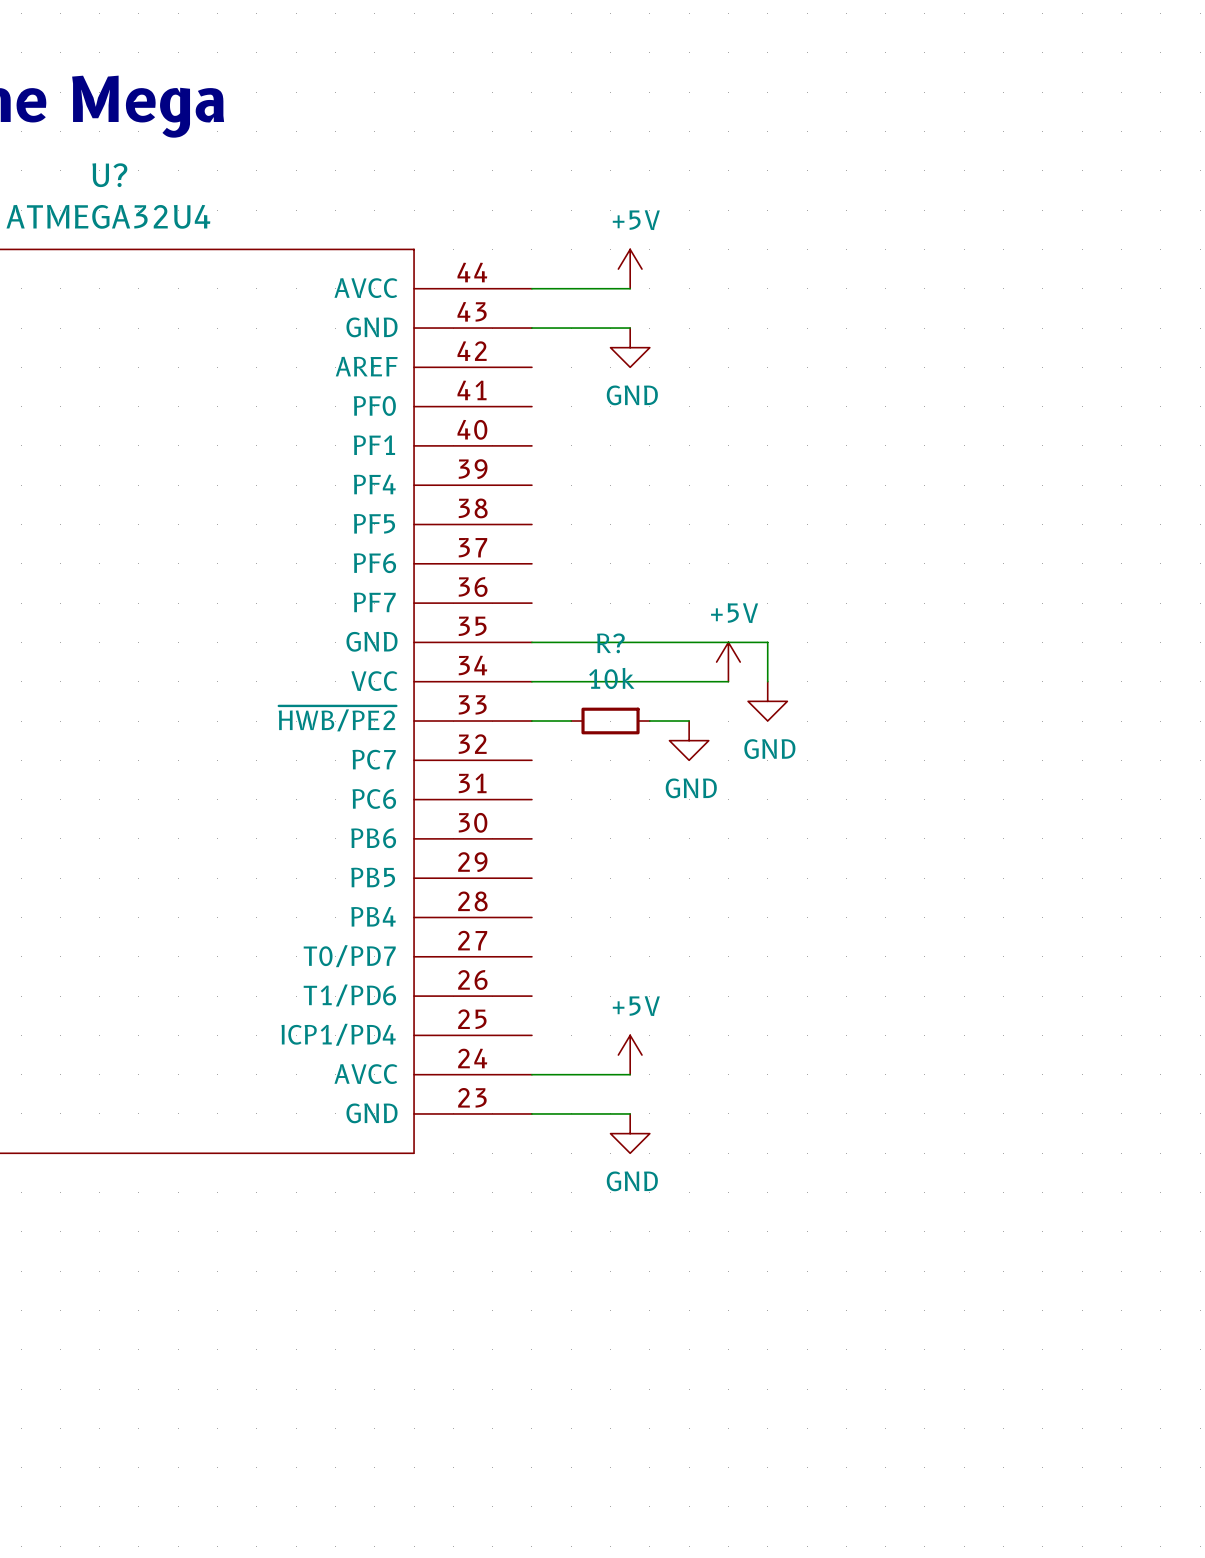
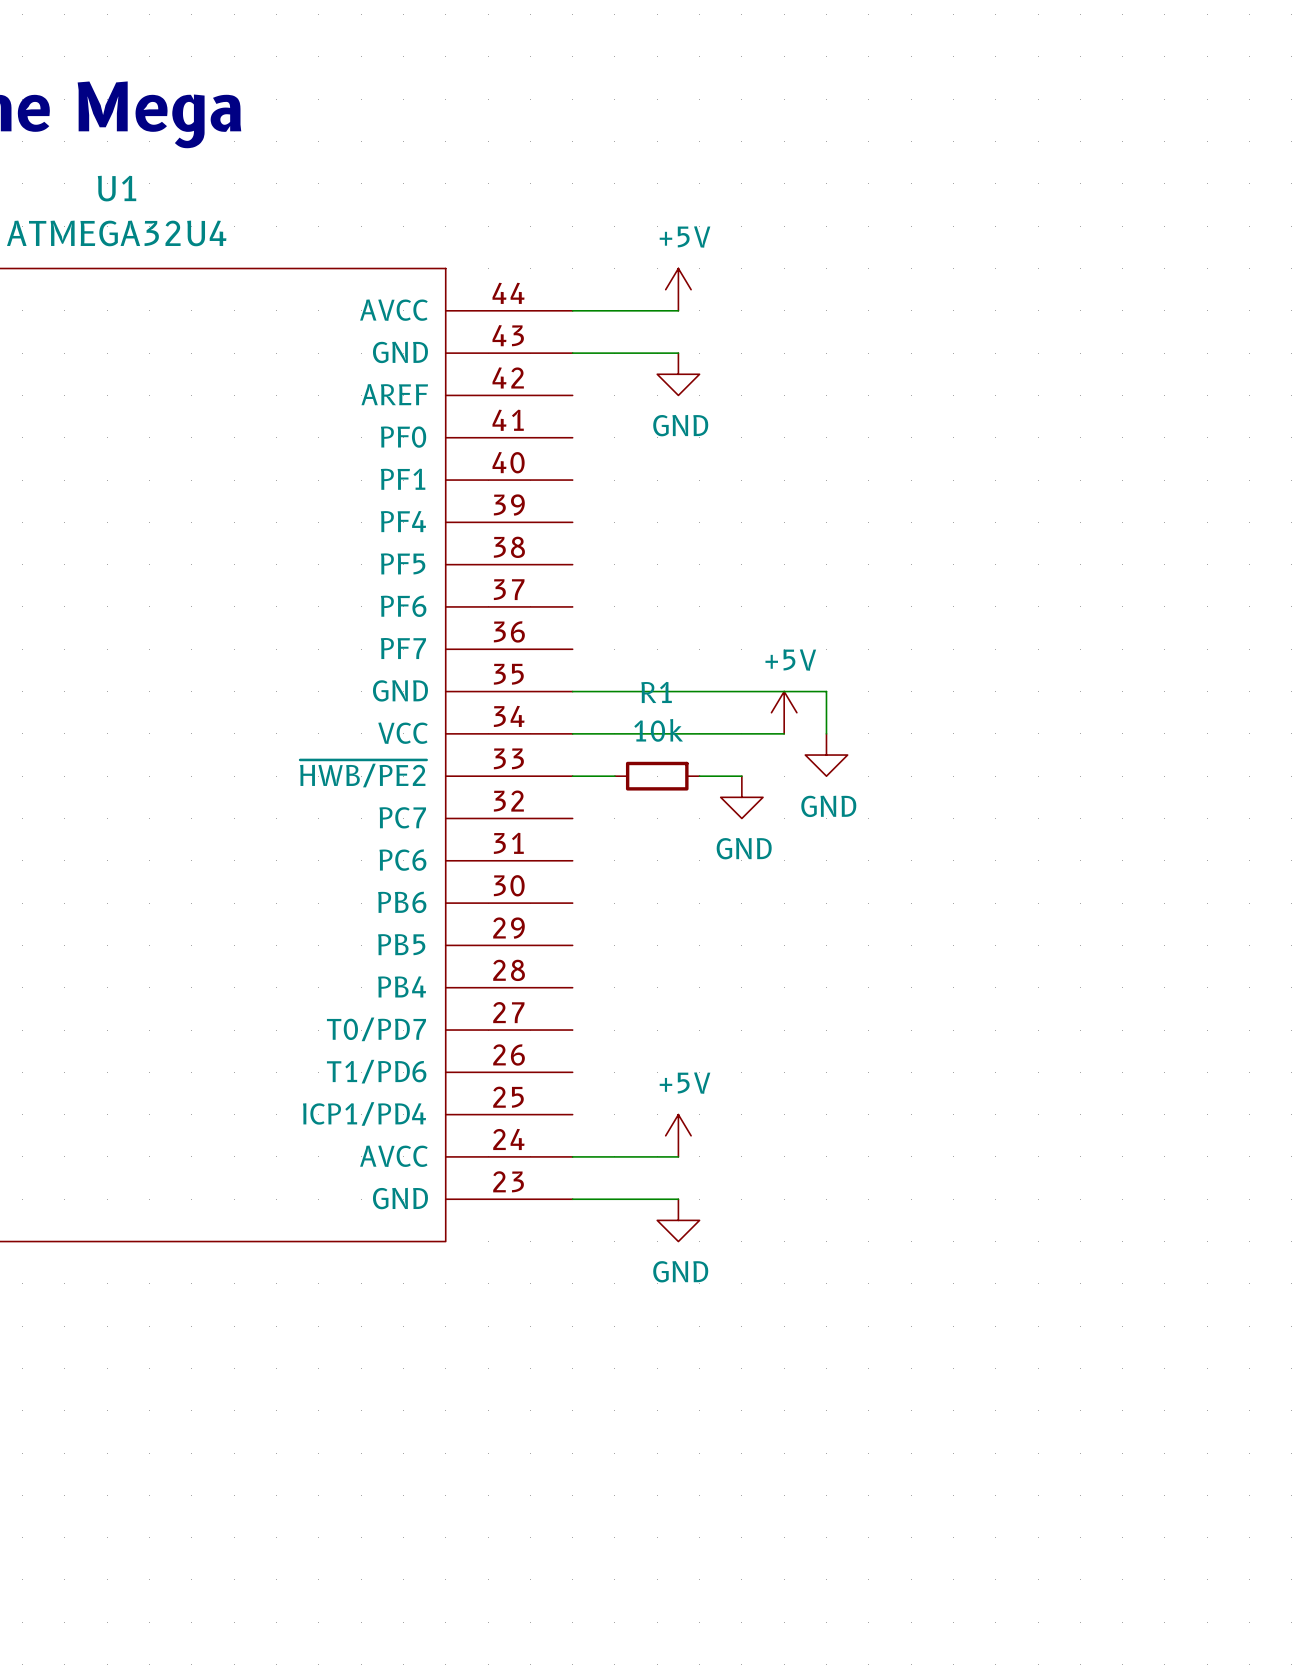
U? name: U? (109, 175) -> U1 (117, 188)
R? name: R? (610, 643) -> R1 (656, 692)

